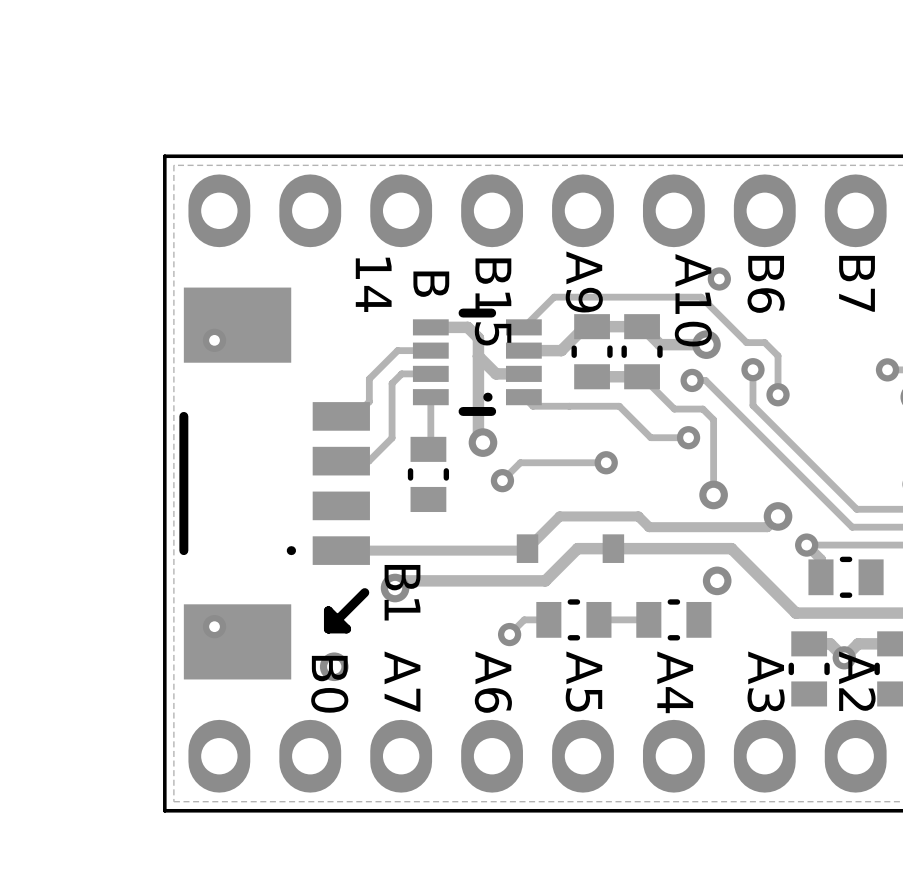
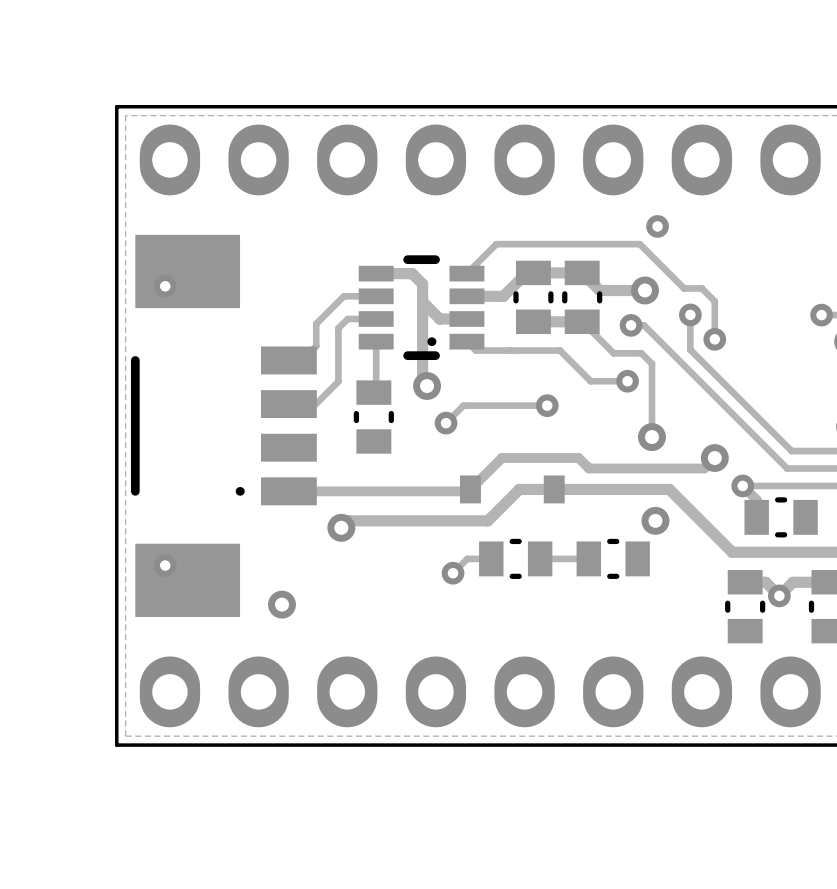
text: A9 (584, 281) -> none
text: B7 (857, 283) -> none
text: 14 (373, 284) -> none
text: B (431, 284) -> none
text: B6 (766, 284) -> none
text: A10 (693, 300) -> none
text: B15 (493, 301) -> none
line: (364, 592) (328, 628) -> none
text: B1 (402, 592) -> none
line: (328, 628) (346, 628) (328, 610) (328, 628) -> none
text: A7 (402, 681) -> none
text: A5 (583, 681) -> none
text: A3 (766, 681) -> none
text: A2 (857, 681) -> none
text: A6 (493, 682) -> none
text: A4 (675, 682) -> none
text: B0 (329, 684) -> none

